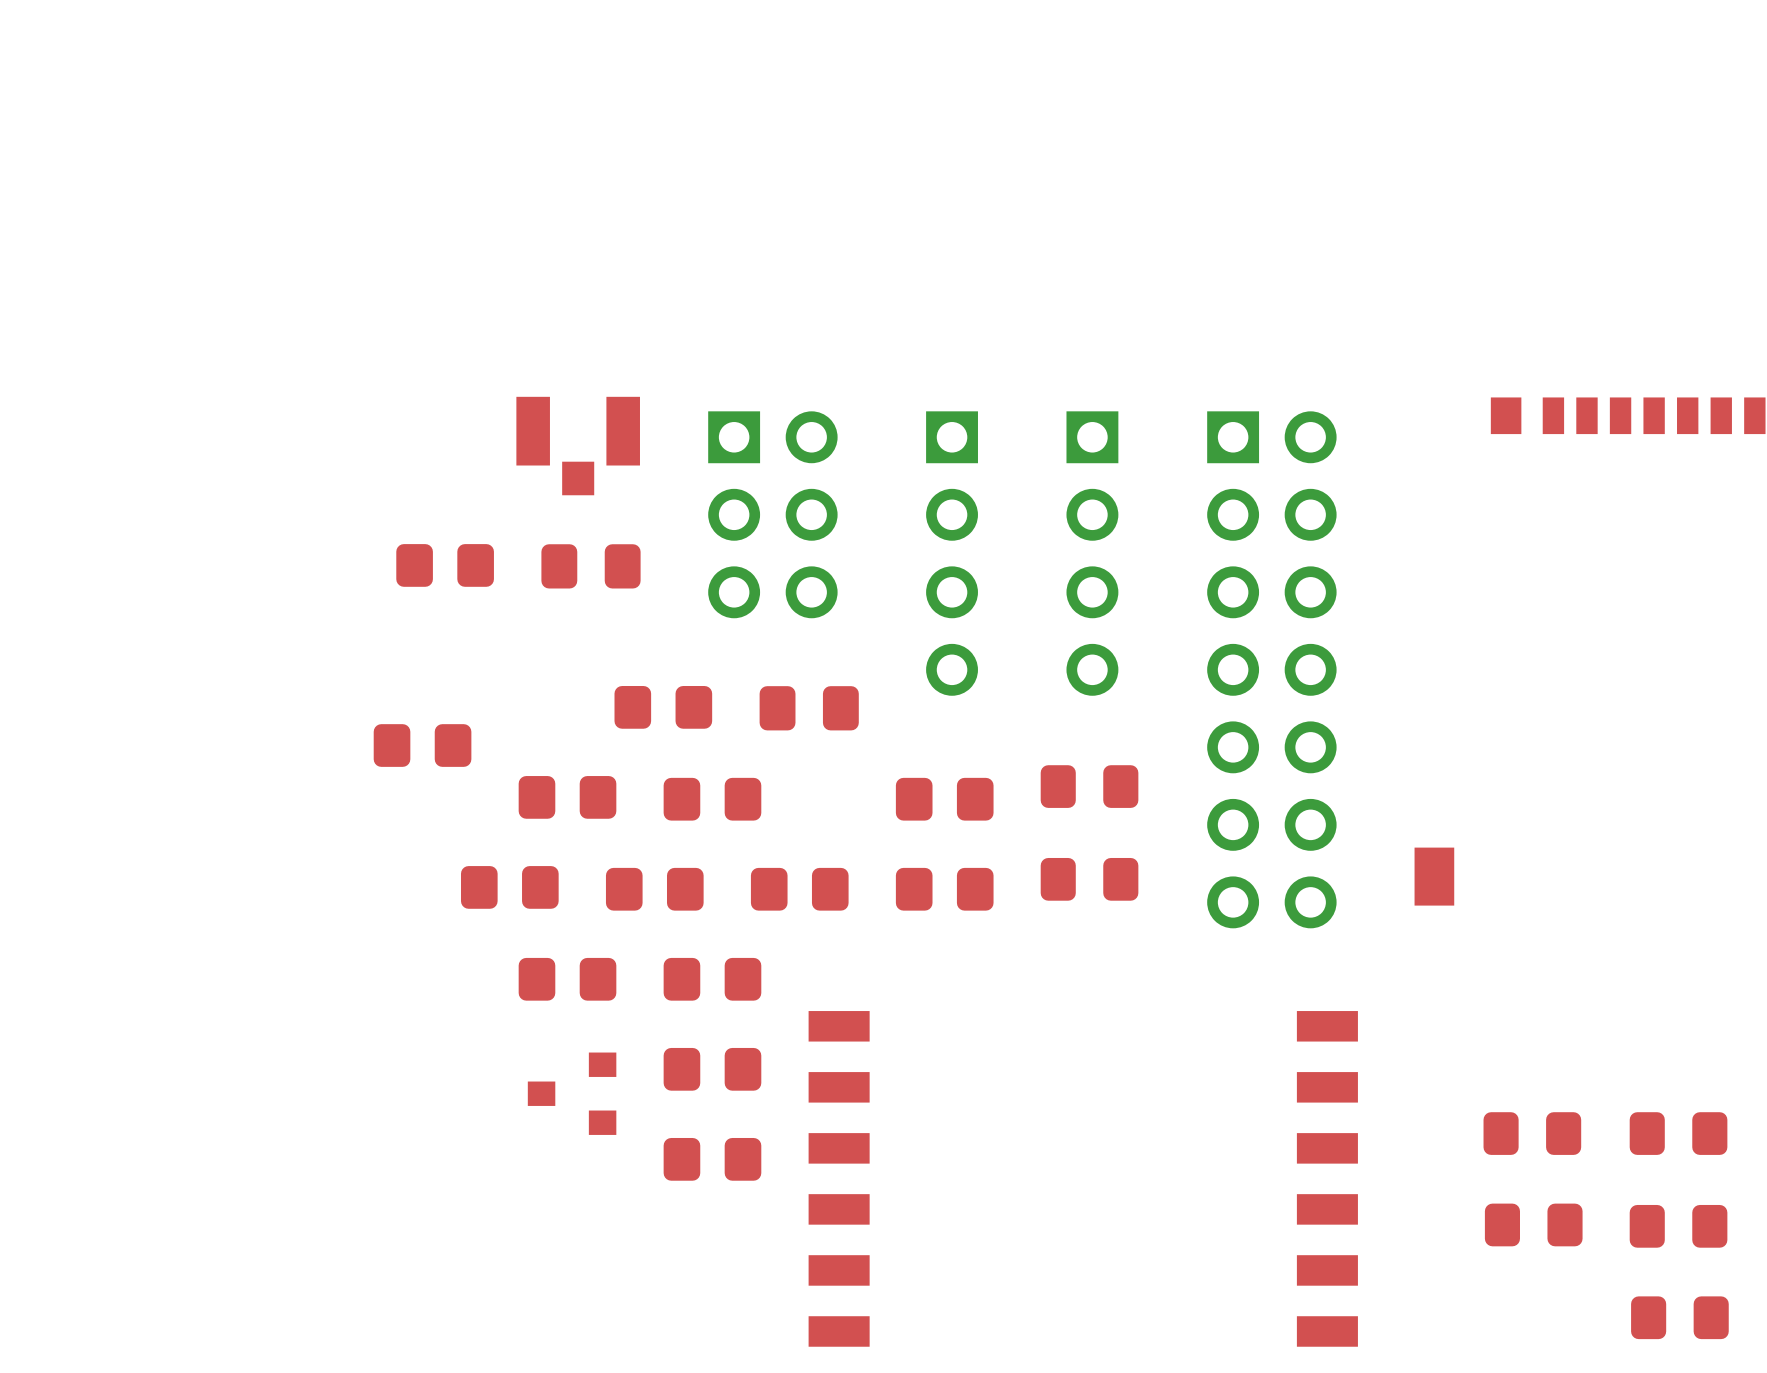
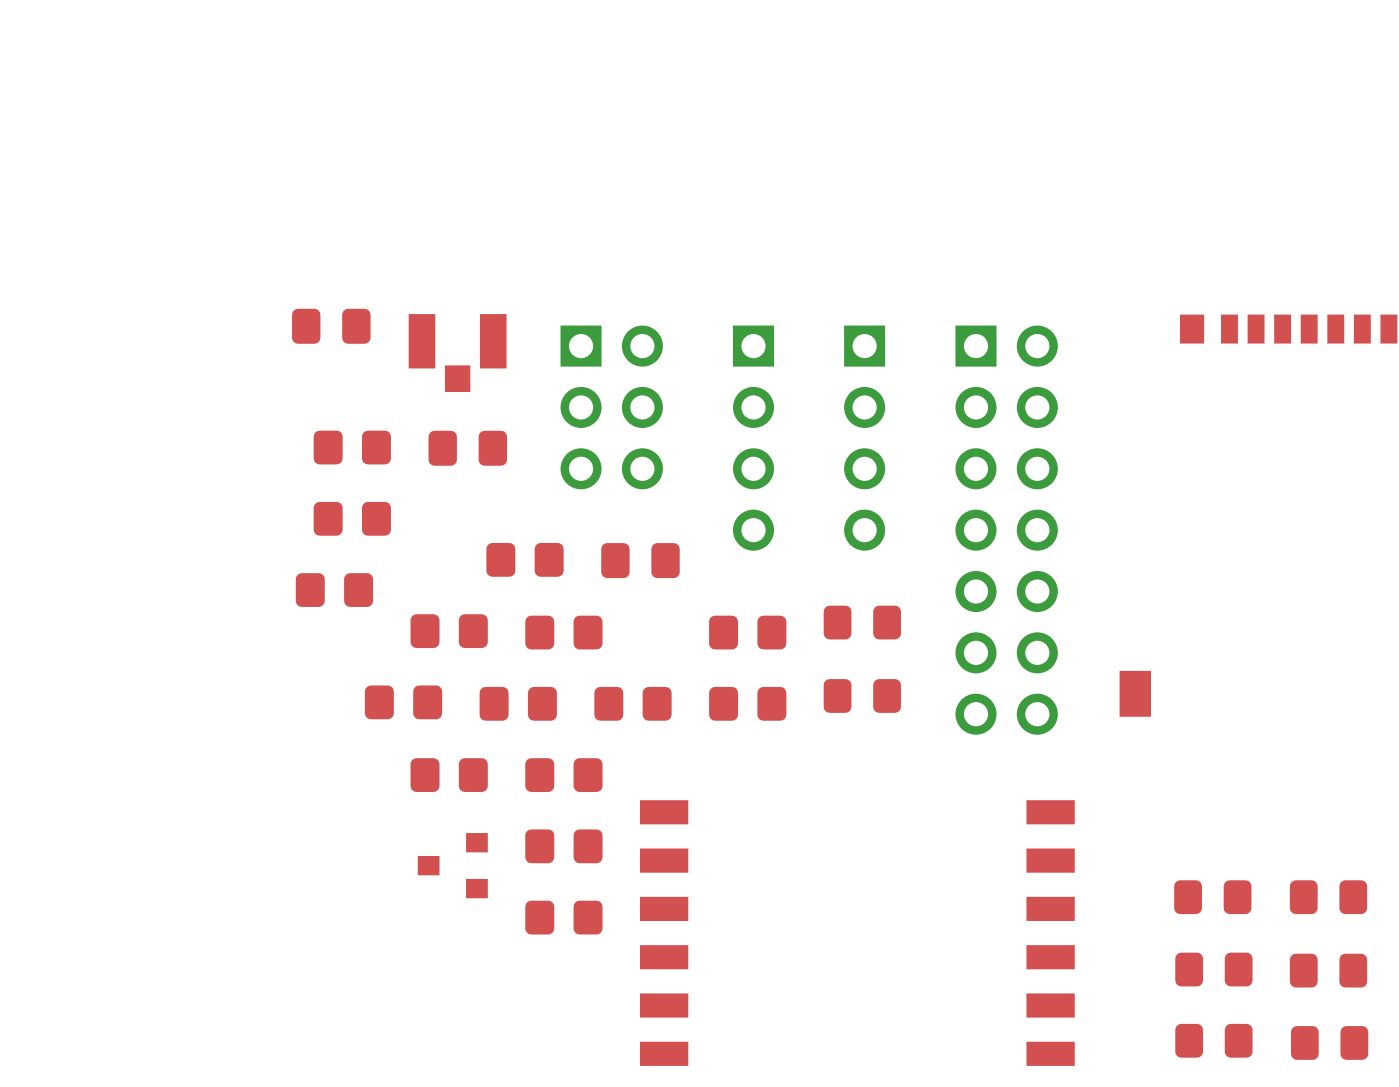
part: none -> (331, 326)
part: none -> (352, 518)
part: none -> (1213, 1040)

